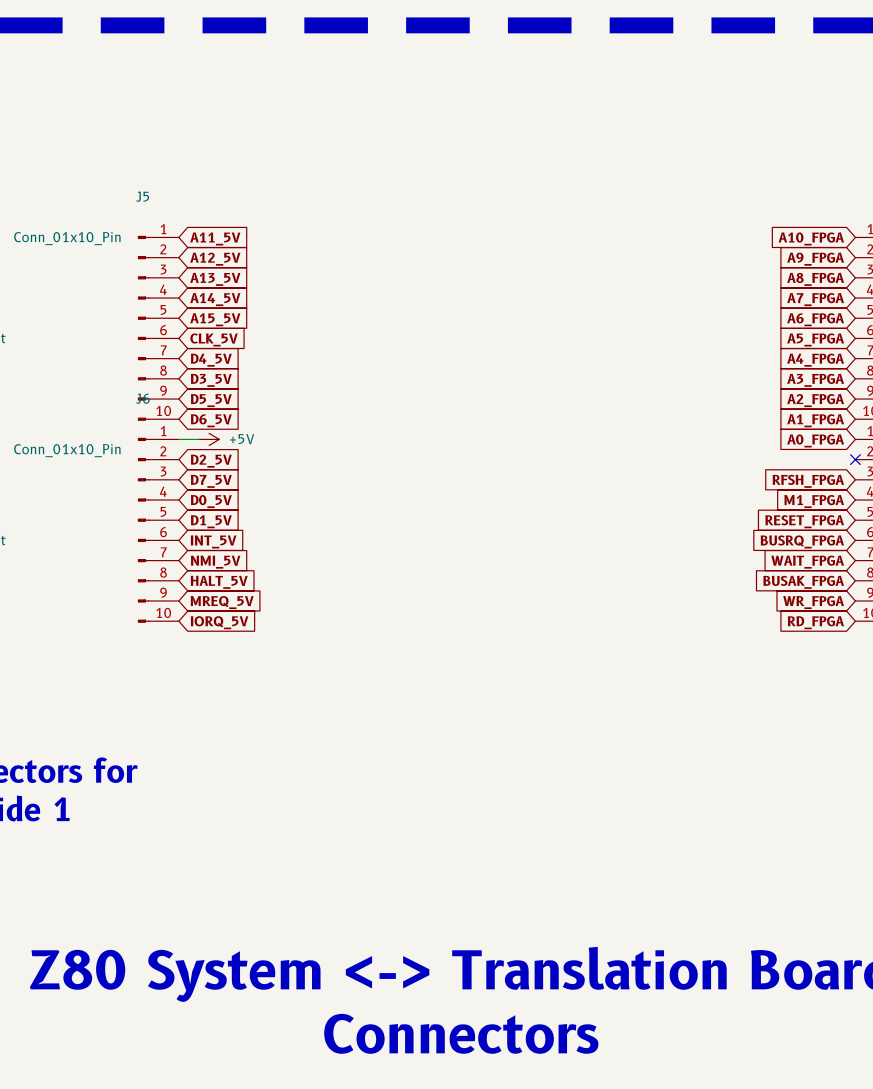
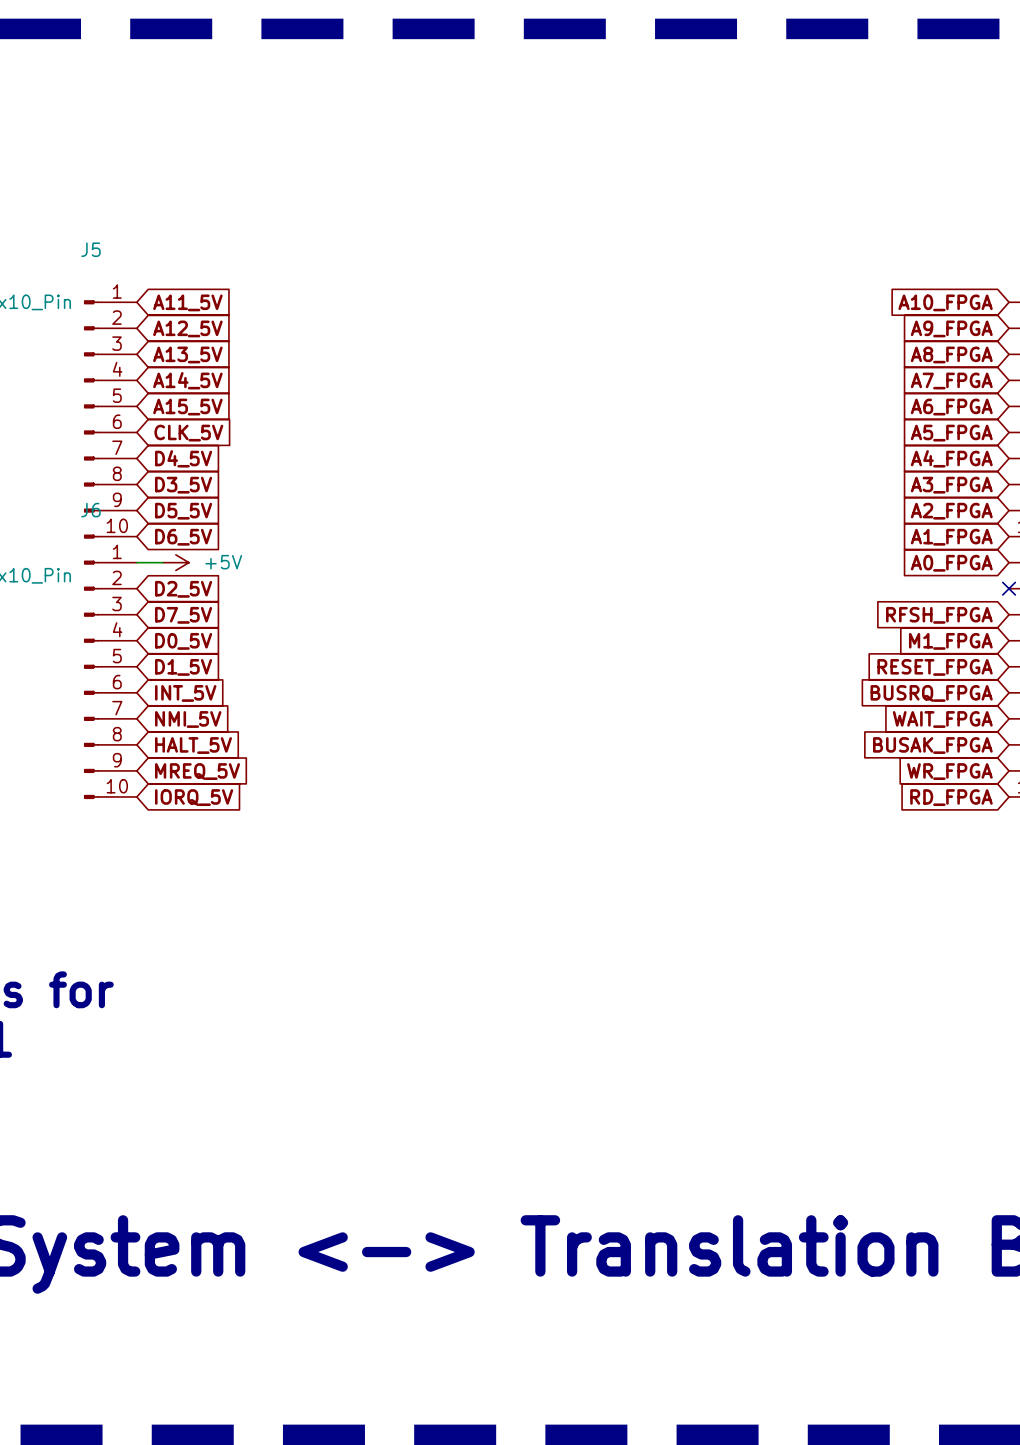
text: Connectors (461, 1033) -> none

